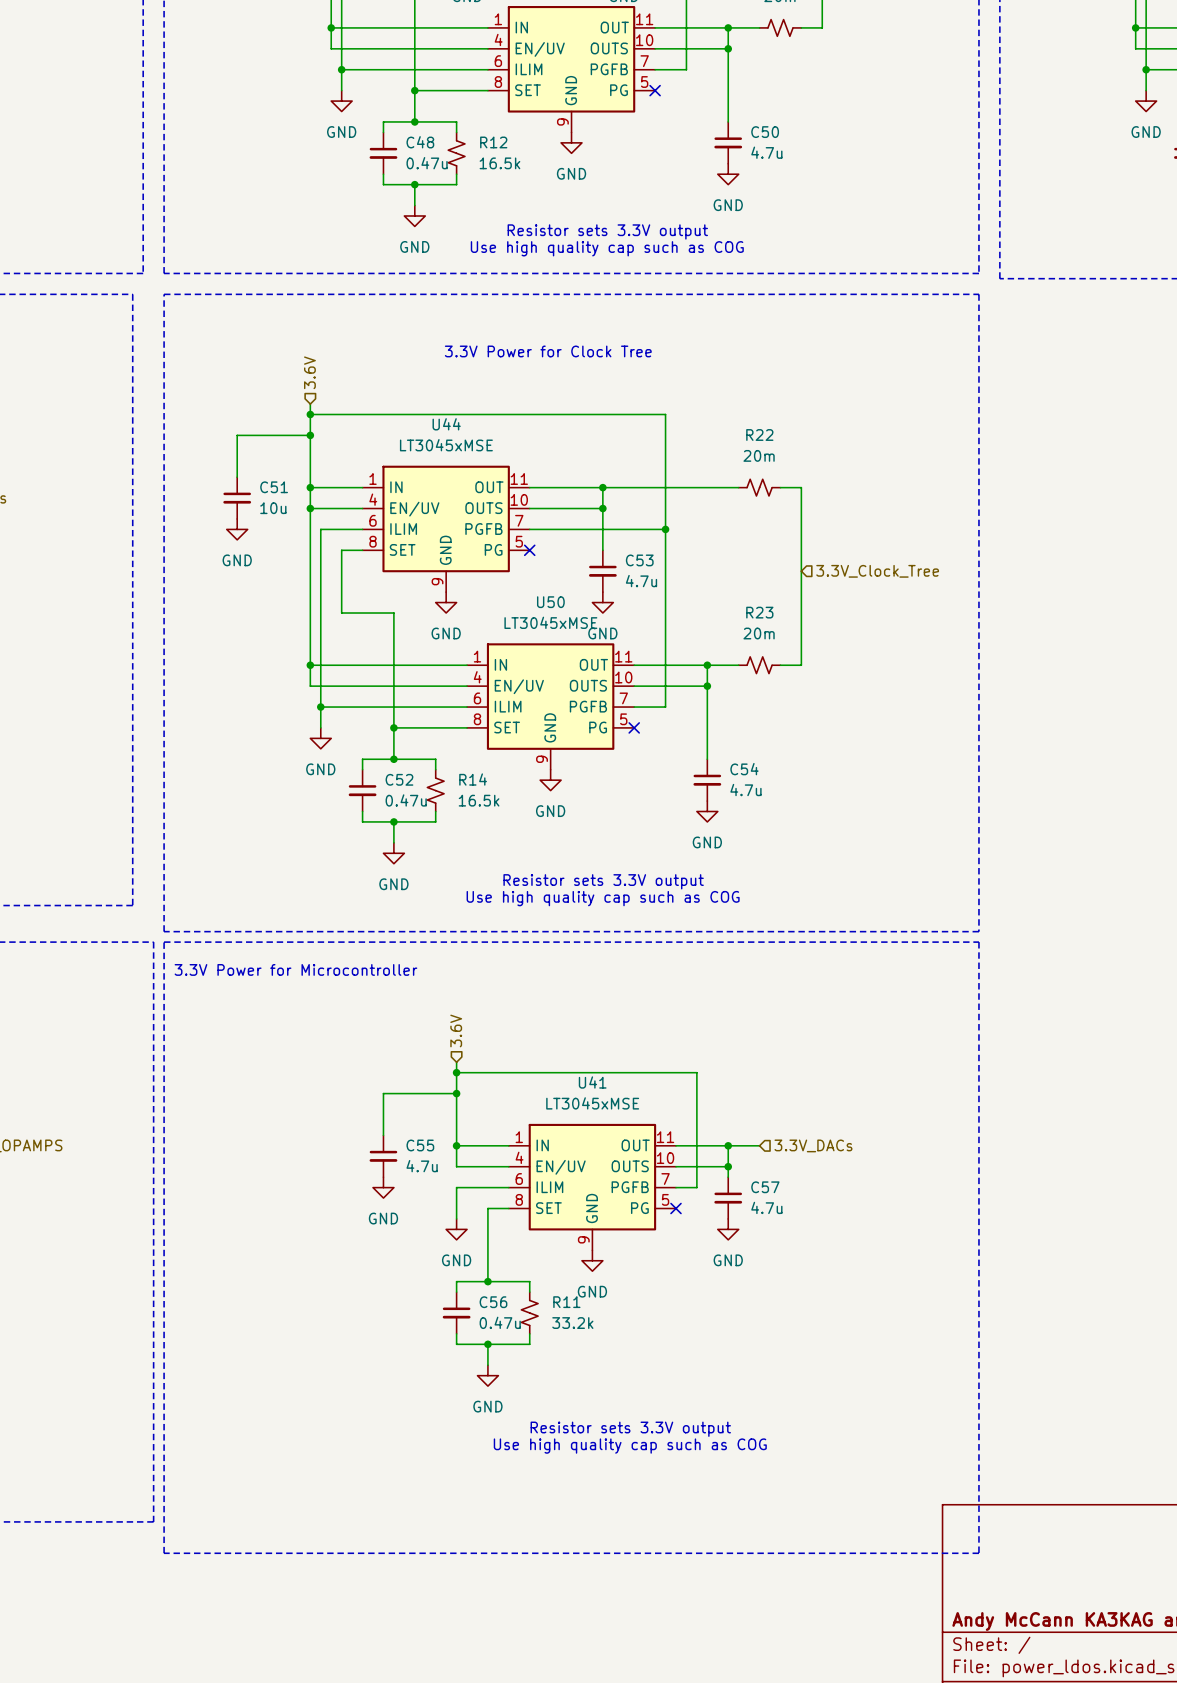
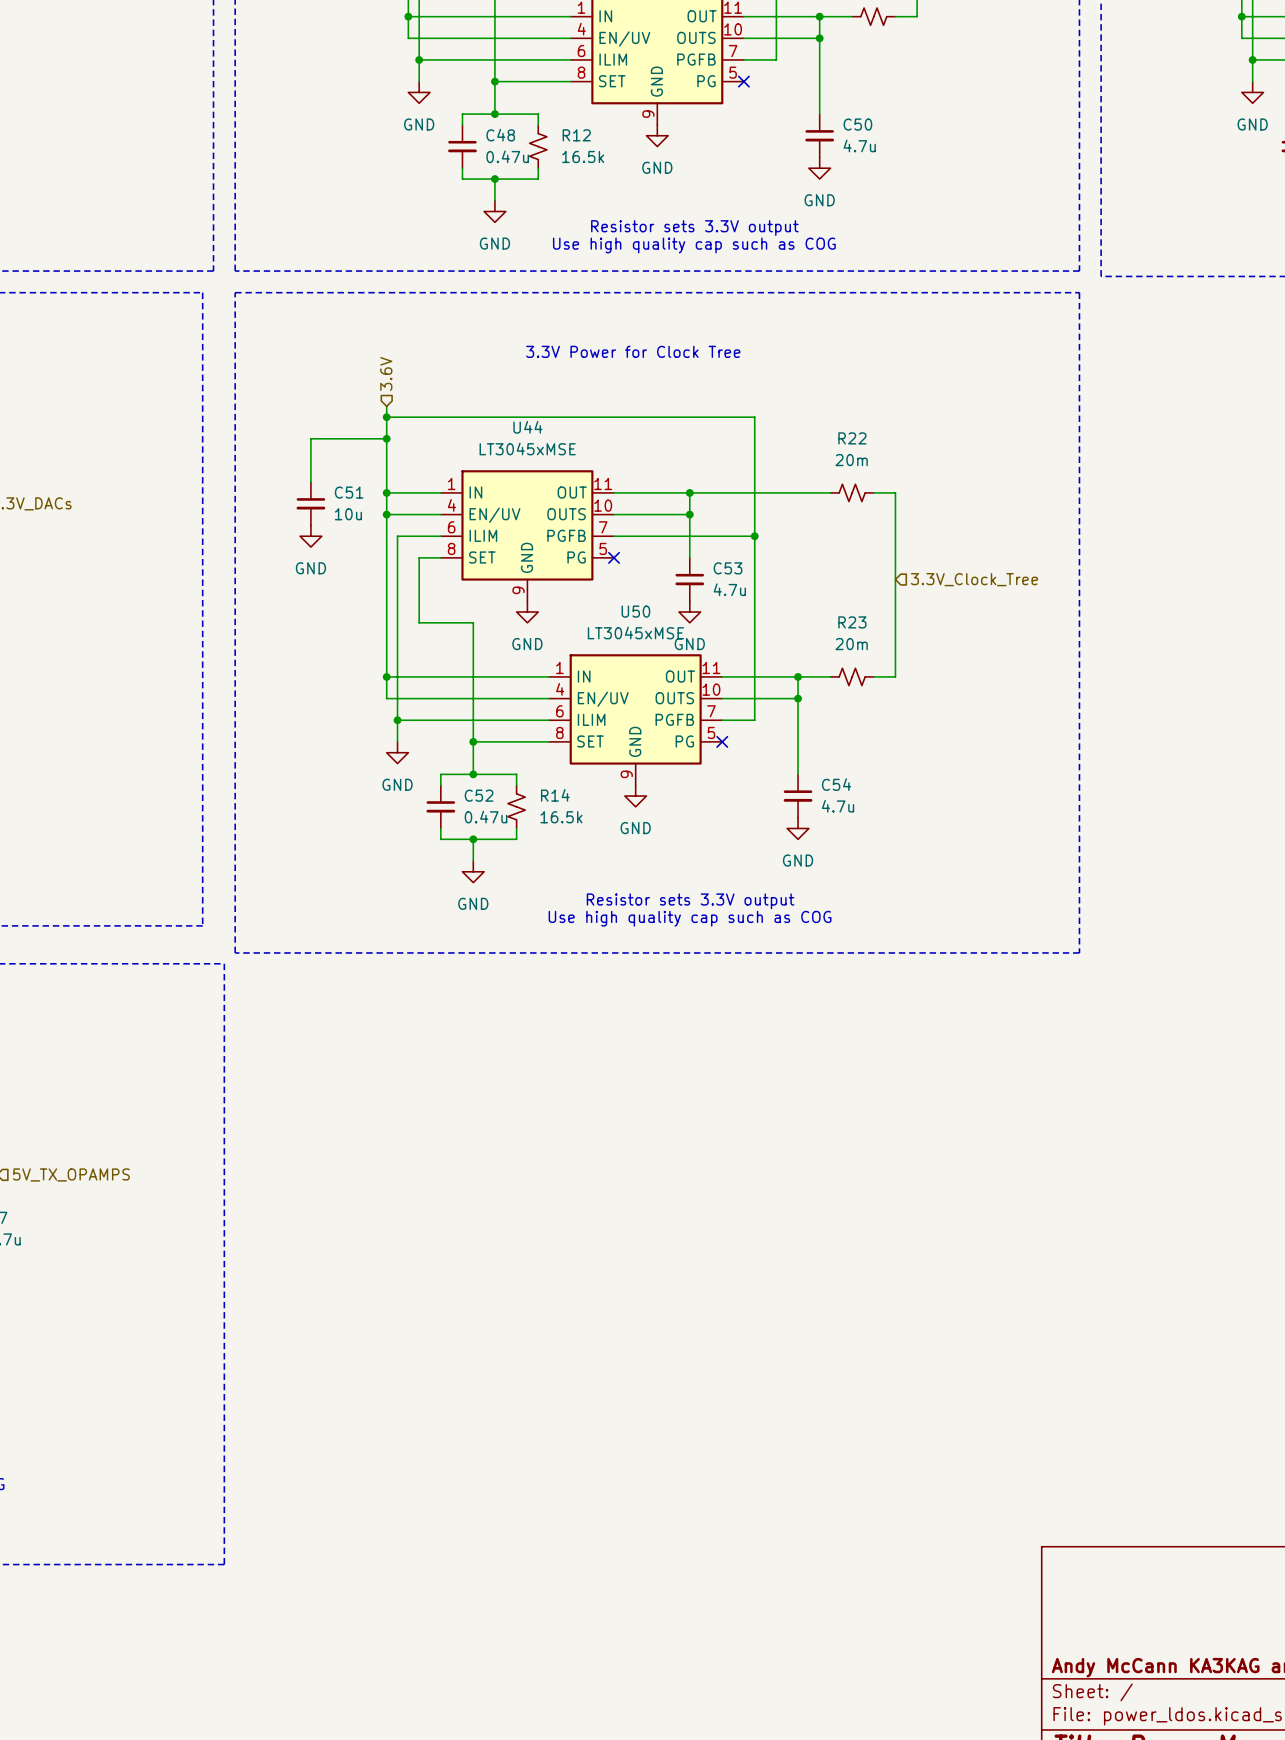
line: (164, 942) (978, 942) (978, 1553) (164, 1553) (164, 942) -> none
text: 3.3V Power for Microcontroller (295, 969) -> none
hierarchical label: 3.6V (456, 1030) -> none
wire: (456, 1062) (456, 1166) (508, 1166) -> none
wire: (456, 1072) (696, 1072) (696, 1187) (675, 1187) -> none
junction: (456, 1072) -> none
wire: (456, 1093) (383, 1093) (383, 1135) -> none
junction: (456, 1093) -> none
wire: (456, 1145) (508, 1145) -> none
junction: (456, 1145) -> none
wire: (675, 1145) (759, 1145) -> none
wire: (728, 1145) (728, 1177) -> none
junction: (728, 1145) -> none
hierarchical label: 3.3V_DACs (813, 1145) -> none
C55: 4.7u (383, 1156) -> none
wire: (675, 1166) (728, 1166) -> none
junction: (728, 1166) -> none
power symbol: GND (383, 1187) -> none
wire: (508, 1187) (456, 1187) (456, 1218) -> none
U41: LT3045xMSE (592, 1187) -> none
C57: 4.7u (728, 1198) -> none
wire: (508, 1208) (487, 1208) (487, 1281) -> none
no-connect mark: (675, 1208) -> none
power symbol: GND (456, 1229) -> none
power symbol: GND (728, 1229) -> none
power symbol: GND (592, 1260) -> none
junction: (487, 1281) -> none
wire: (456, 1292) (456, 1281) (529, 1281) (529, 1292) -> none
C56: 0.47u (456, 1312) -> none
R11: 33.2k (529, 1312) -> none
wire: (456, 1333) (456, 1344) (529, 1344) (529, 1333) -> none
wire: (487, 1344) (487, 1365) -> none
junction: (487, 1344) -> none
power symbol: GND (487, 1375) -> none
text: Resistor sets 3.3V output (630, 1429) -> none
text: Use high quality cap such as COG (630, 1446) -> none

